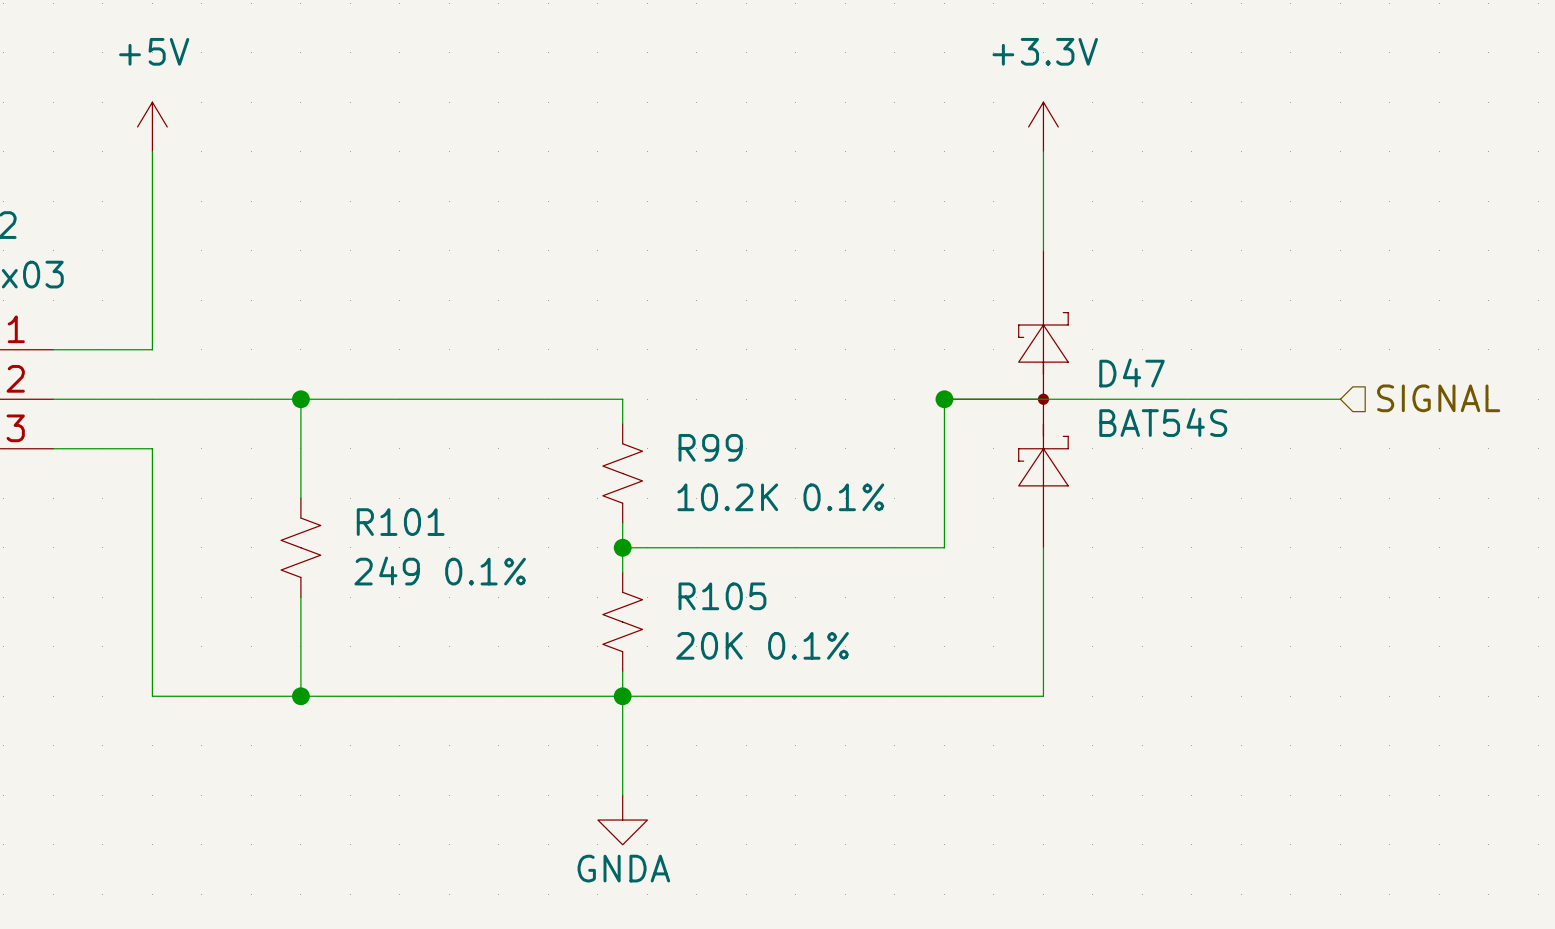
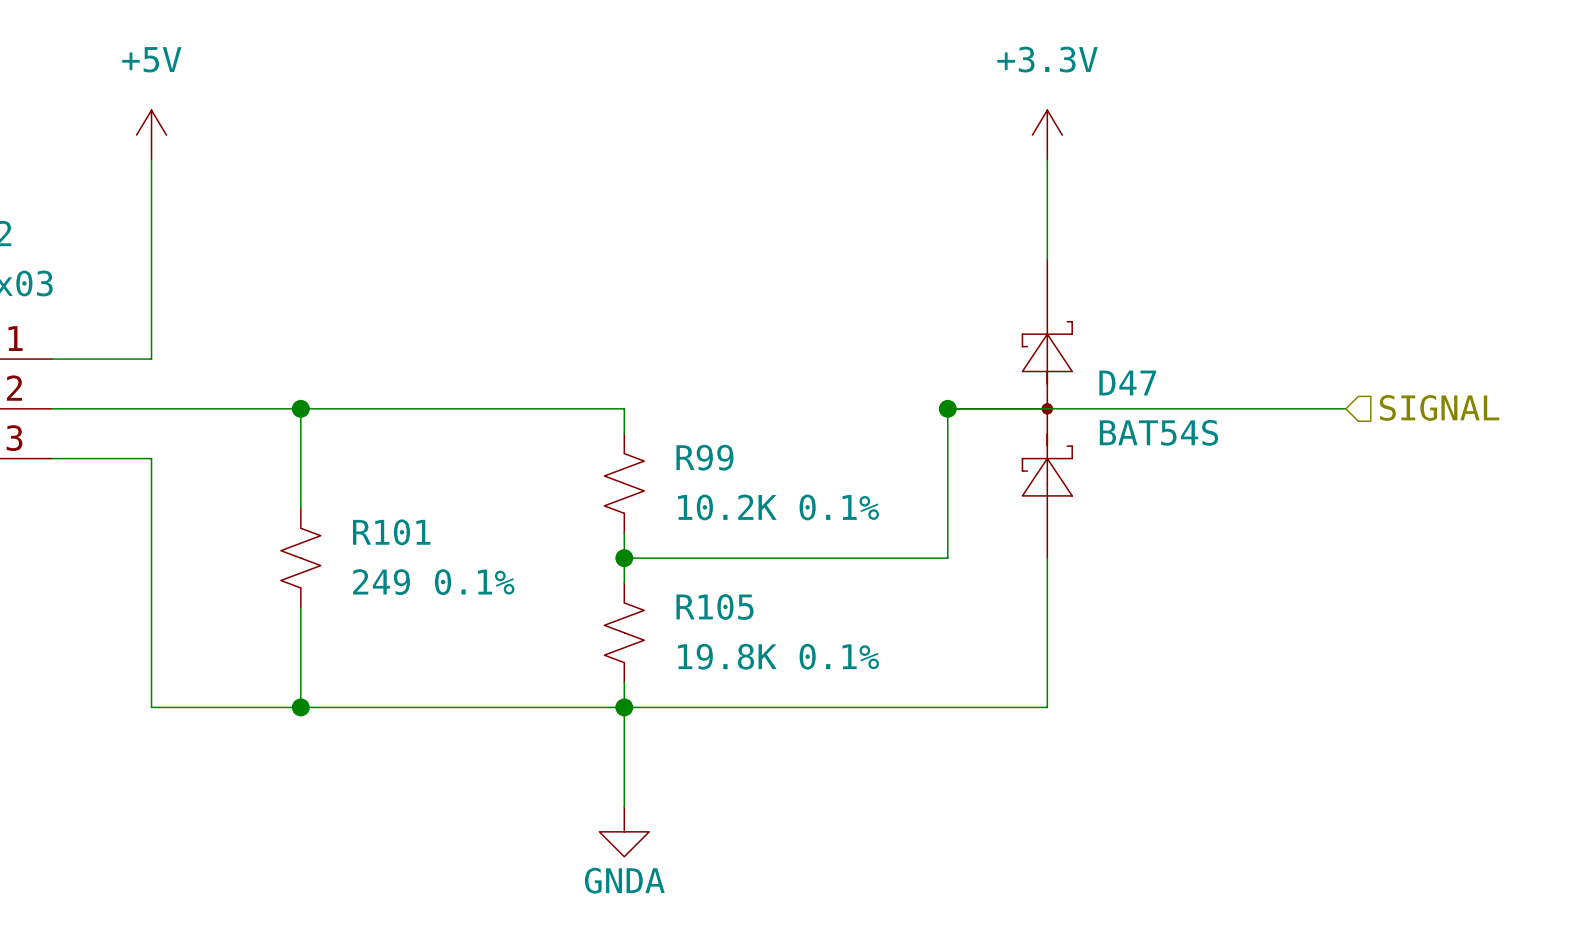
R105 value: 20K 0.1% (762, 645) -> 19.8K 0.1% (778, 656)

